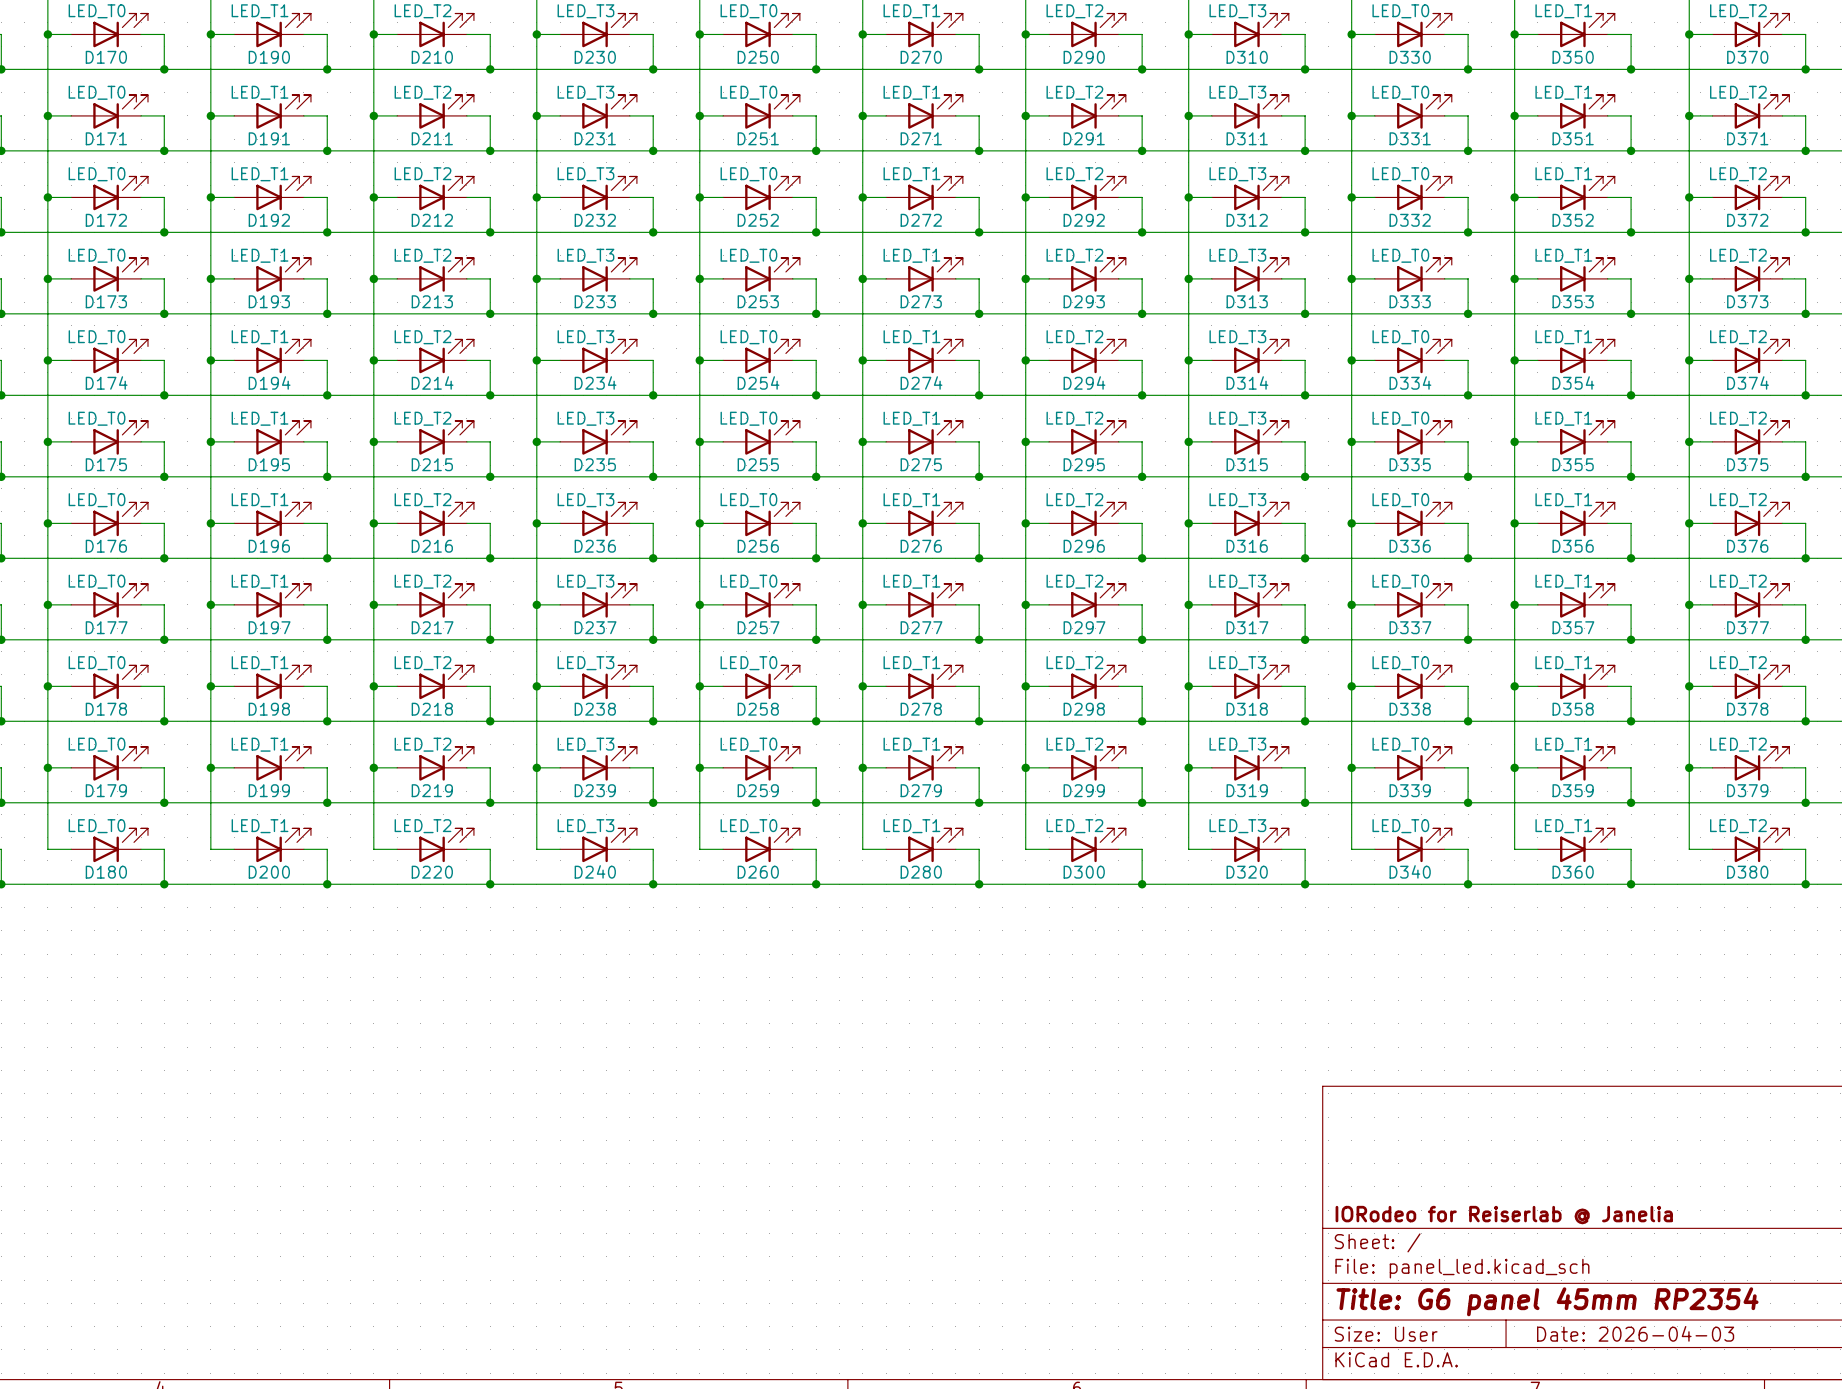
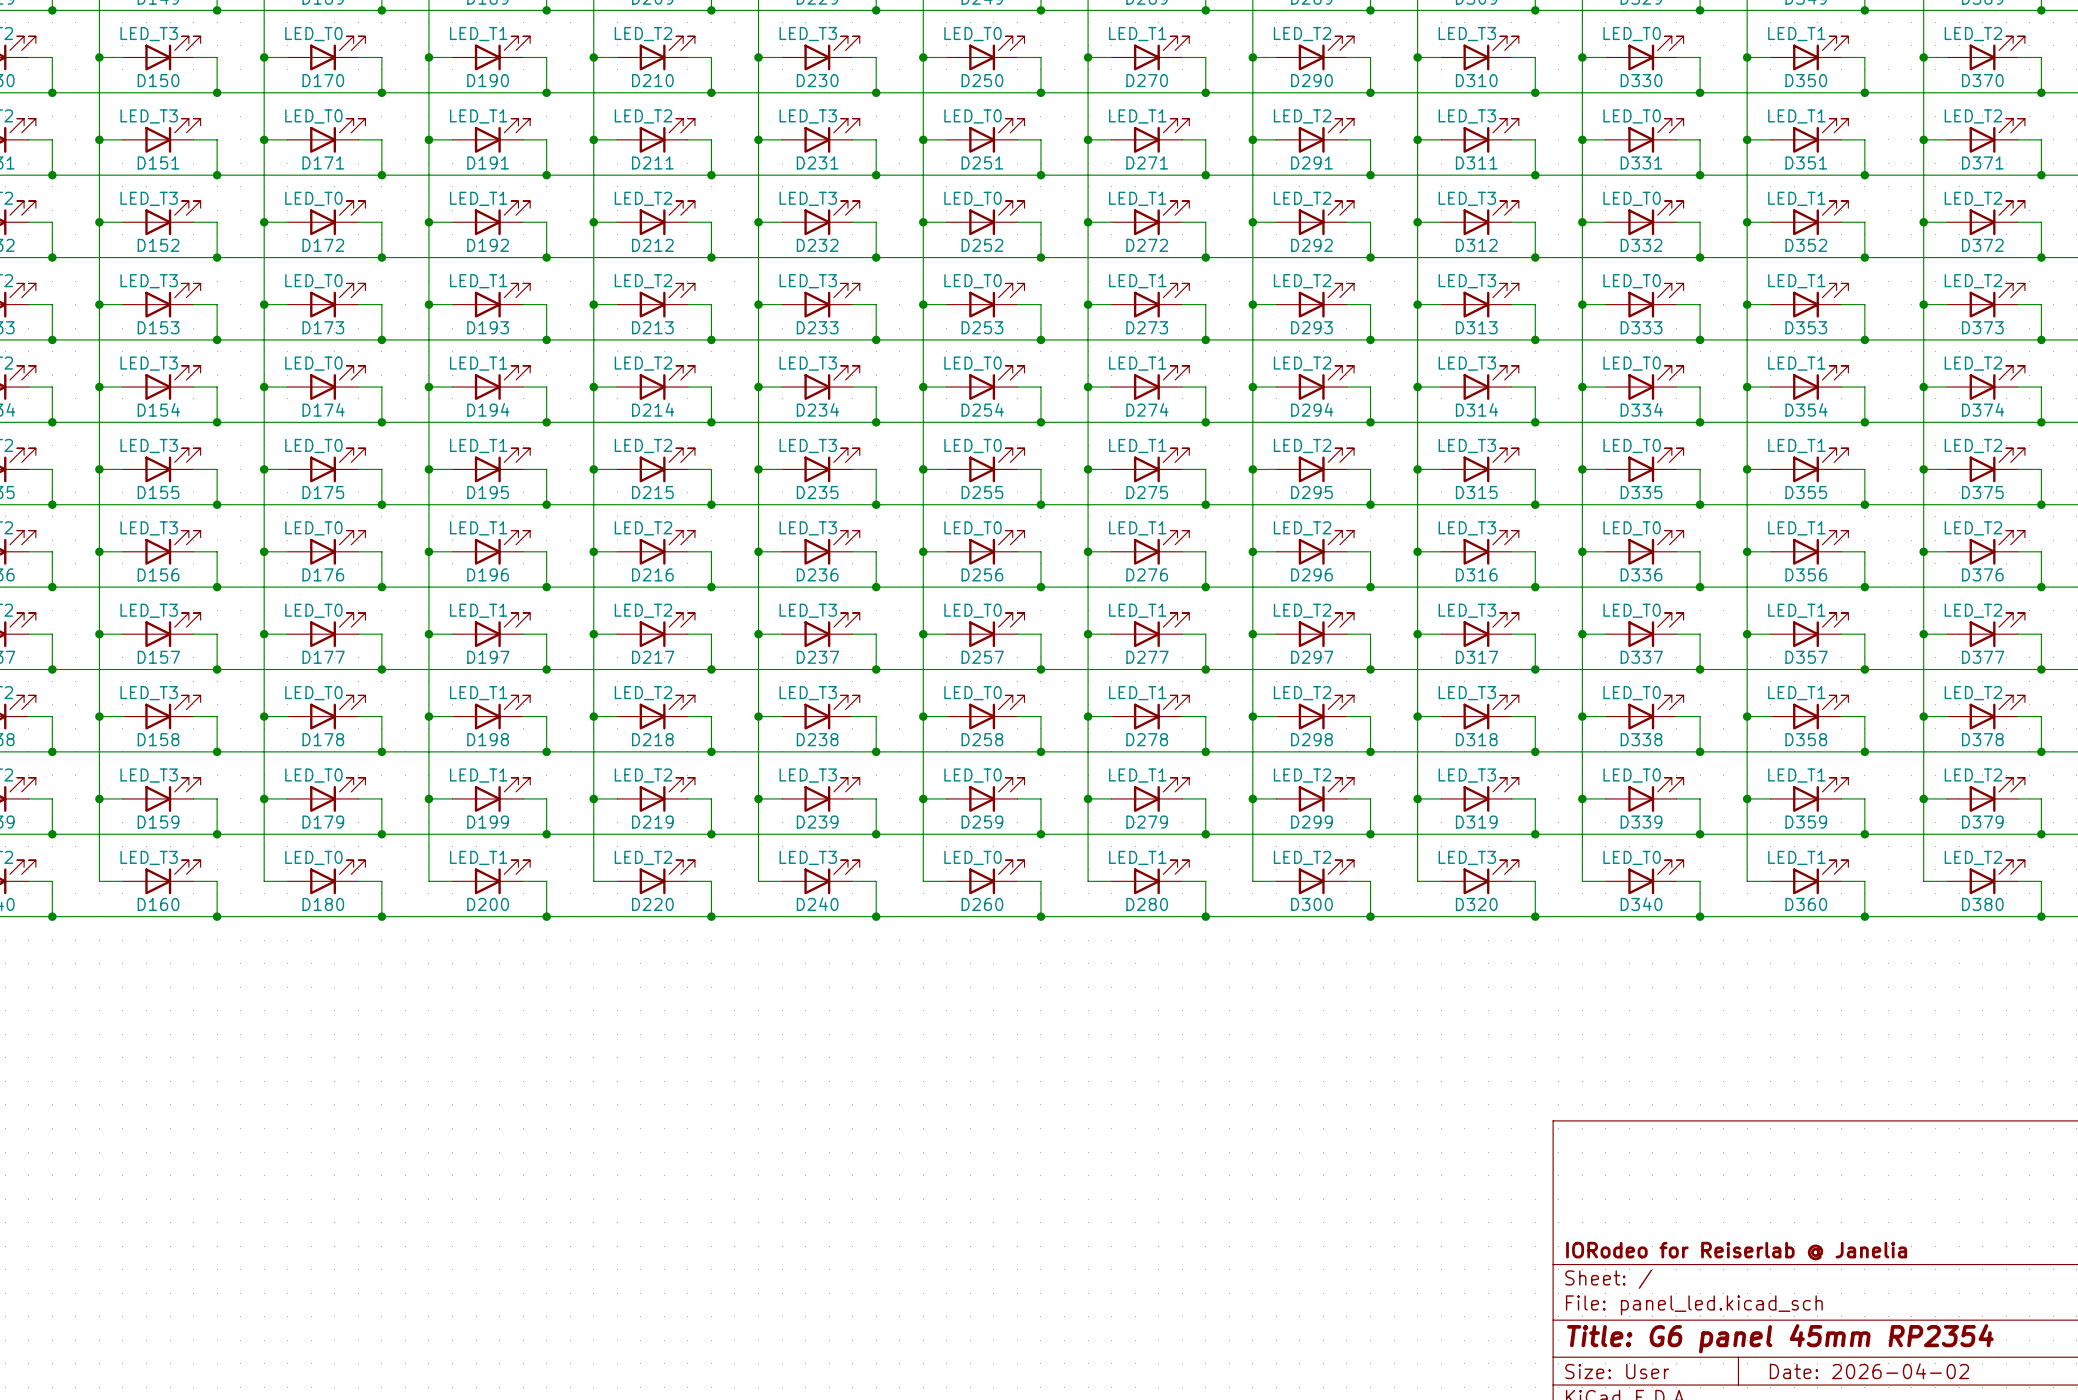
title block: Date: 2026-04-03 (1635, 1333) -> Date: 2026-04-02 (1869, 1371)

